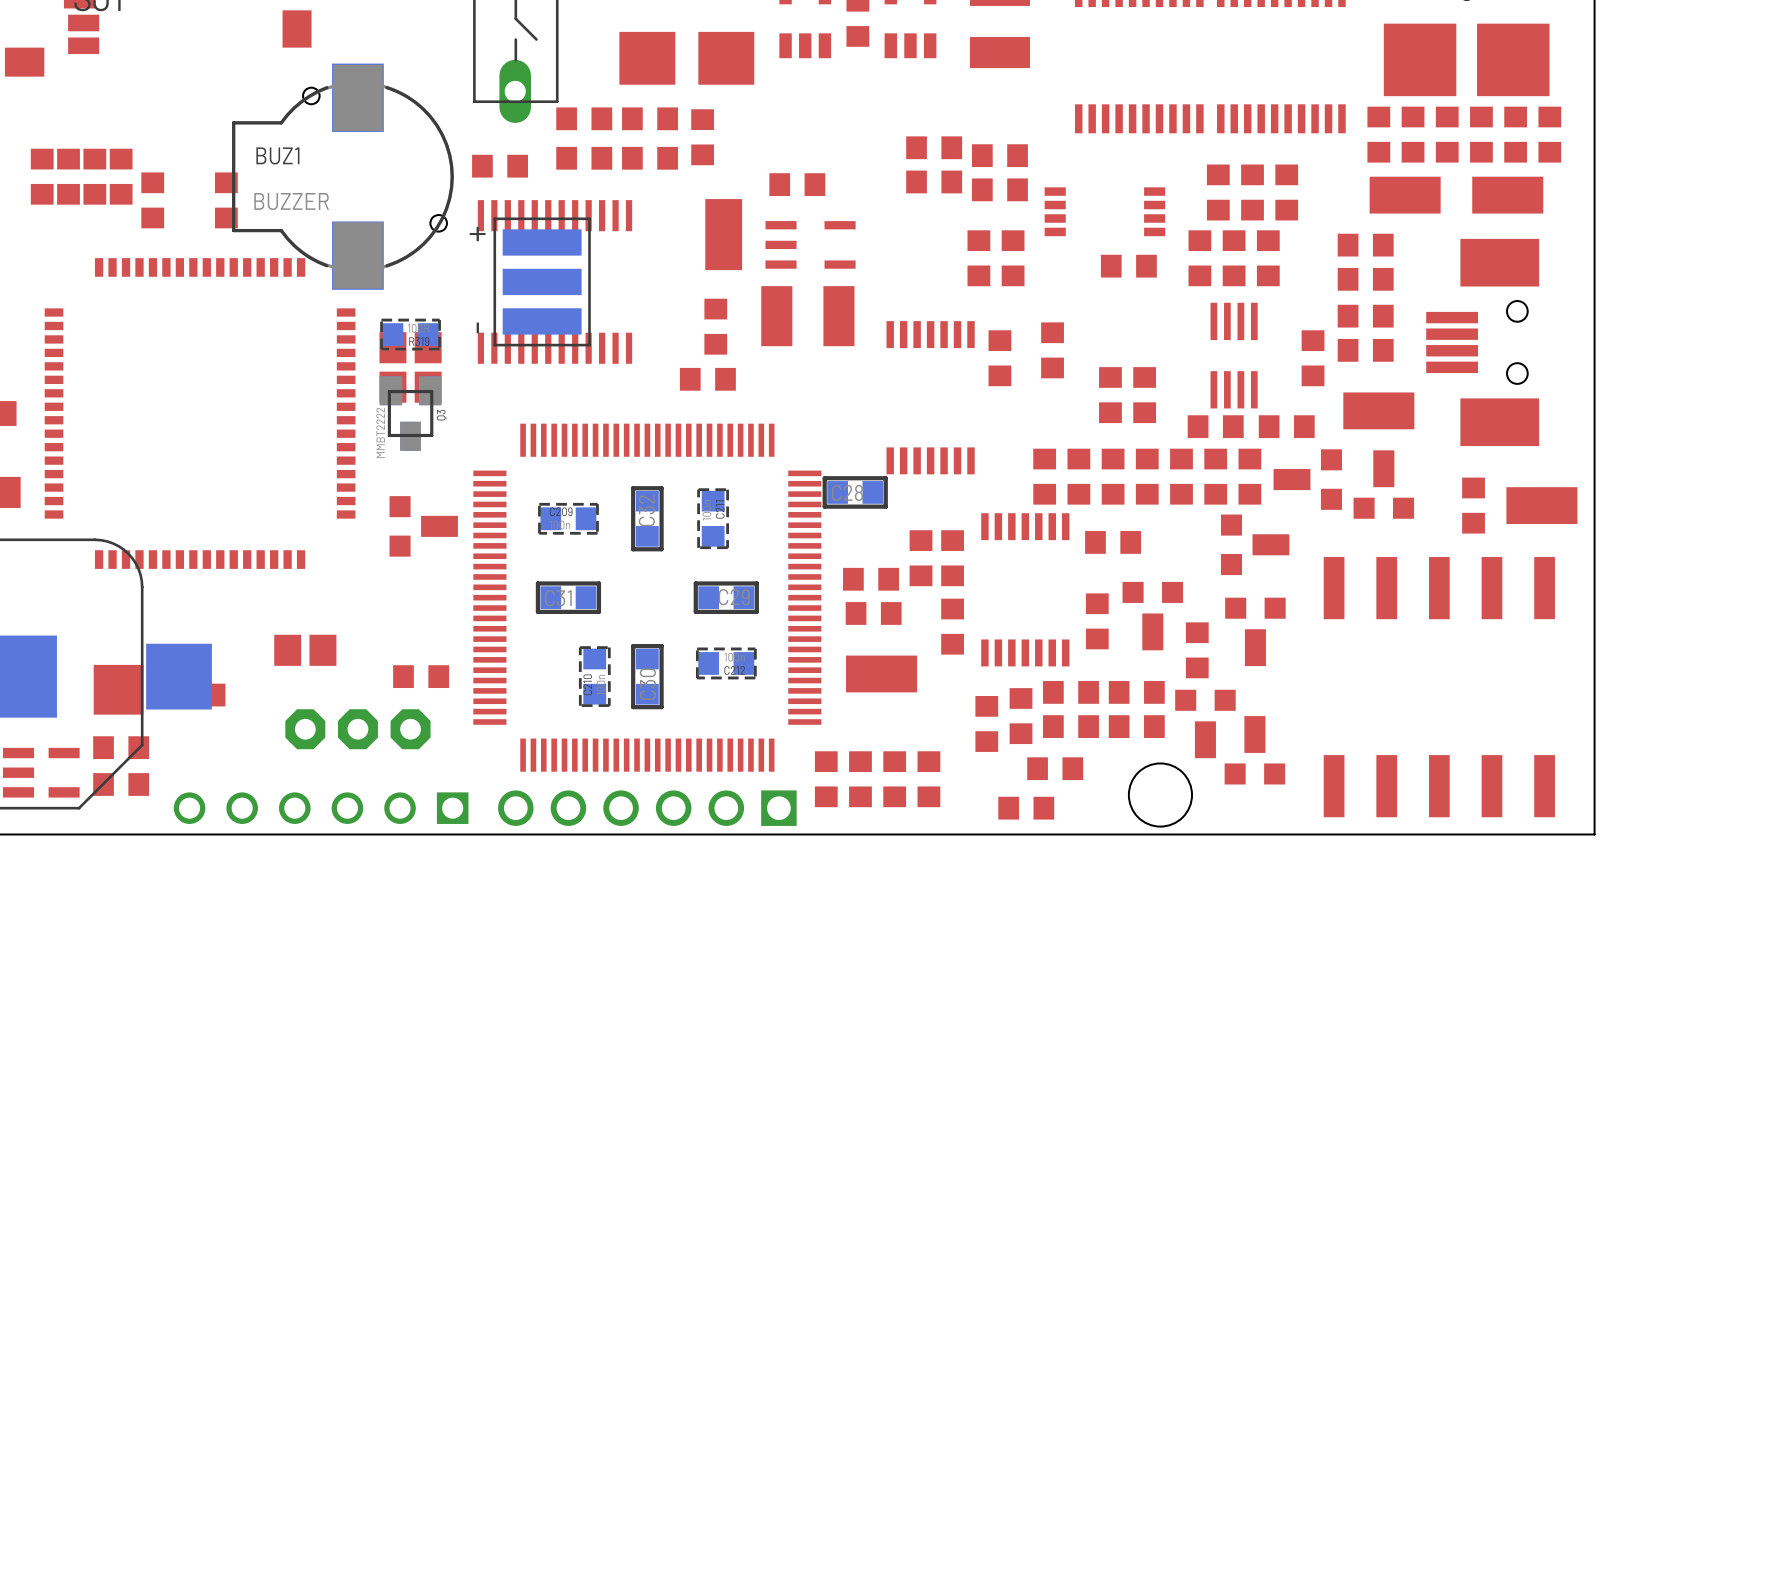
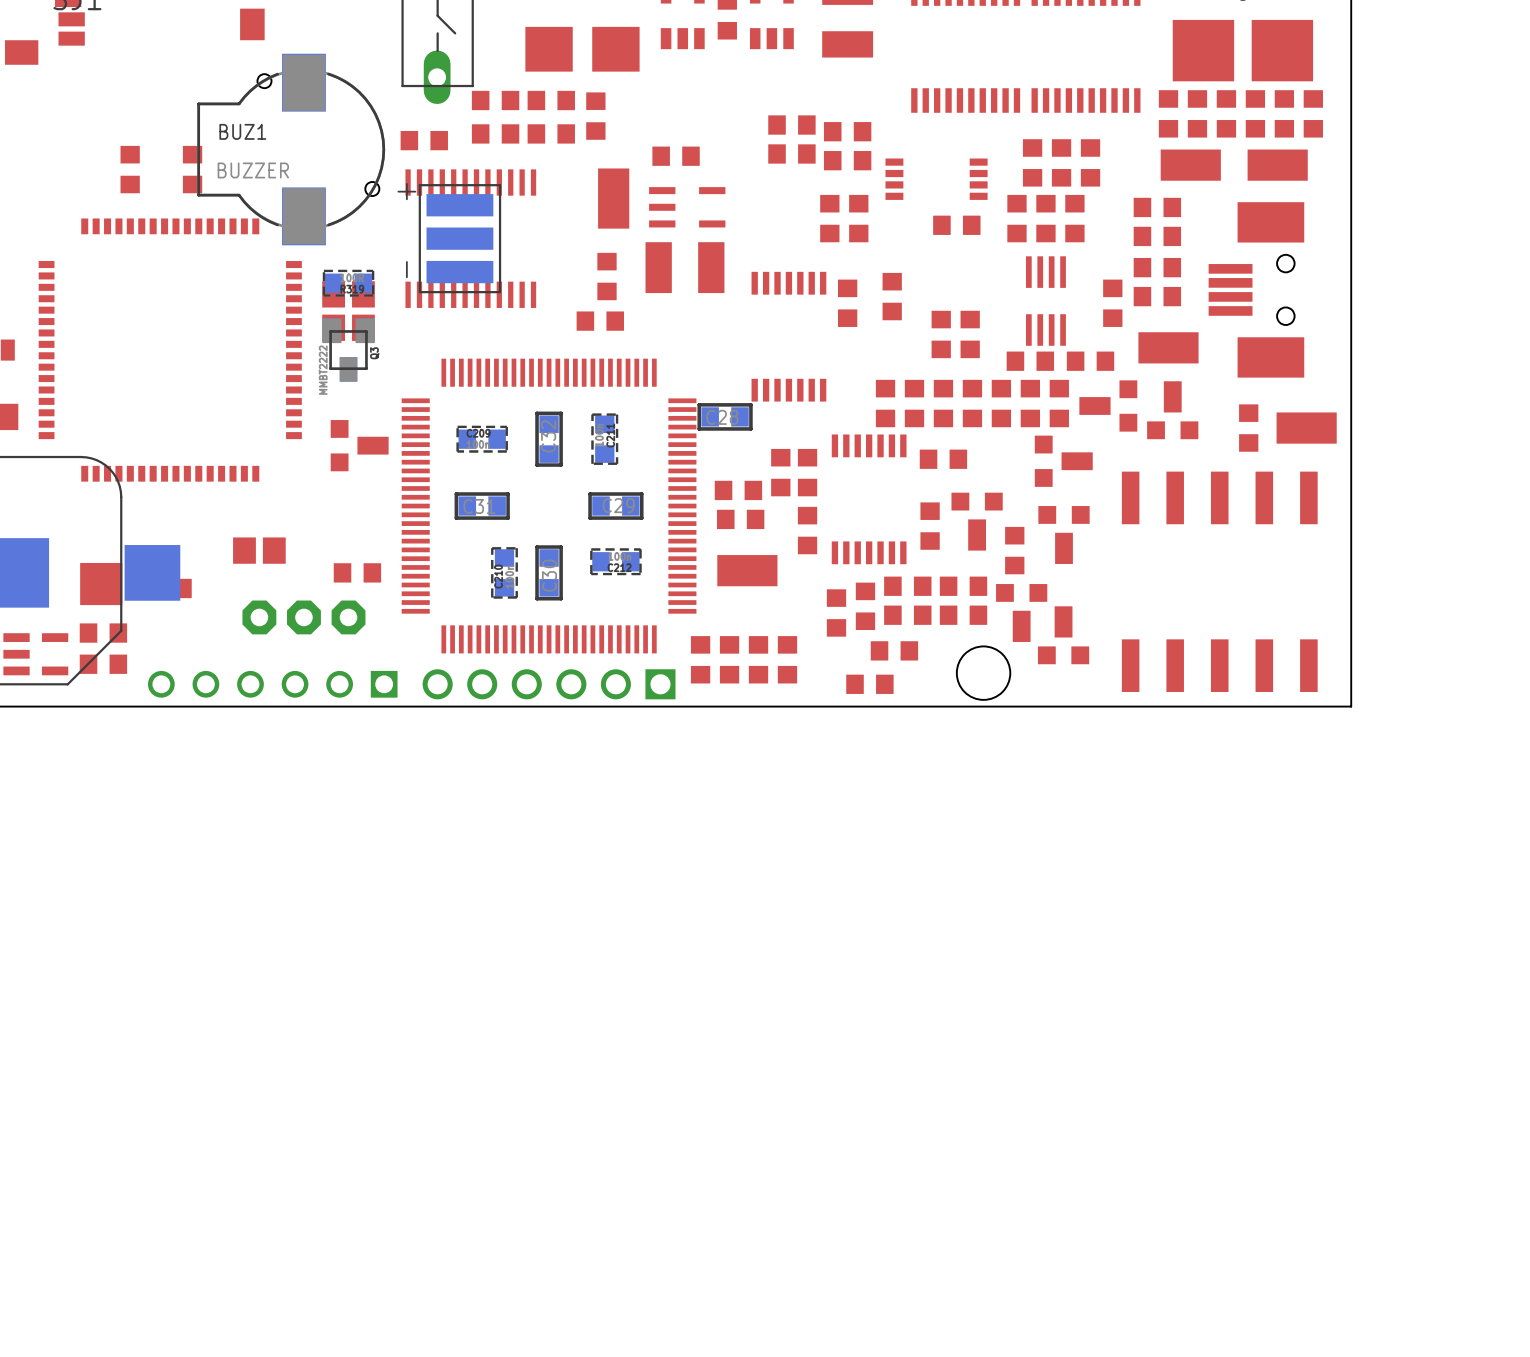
part: (42, 176) -> none
part: (68, 176) -> none
part: (94, 176) -> none
part: (121, 176) -> none

